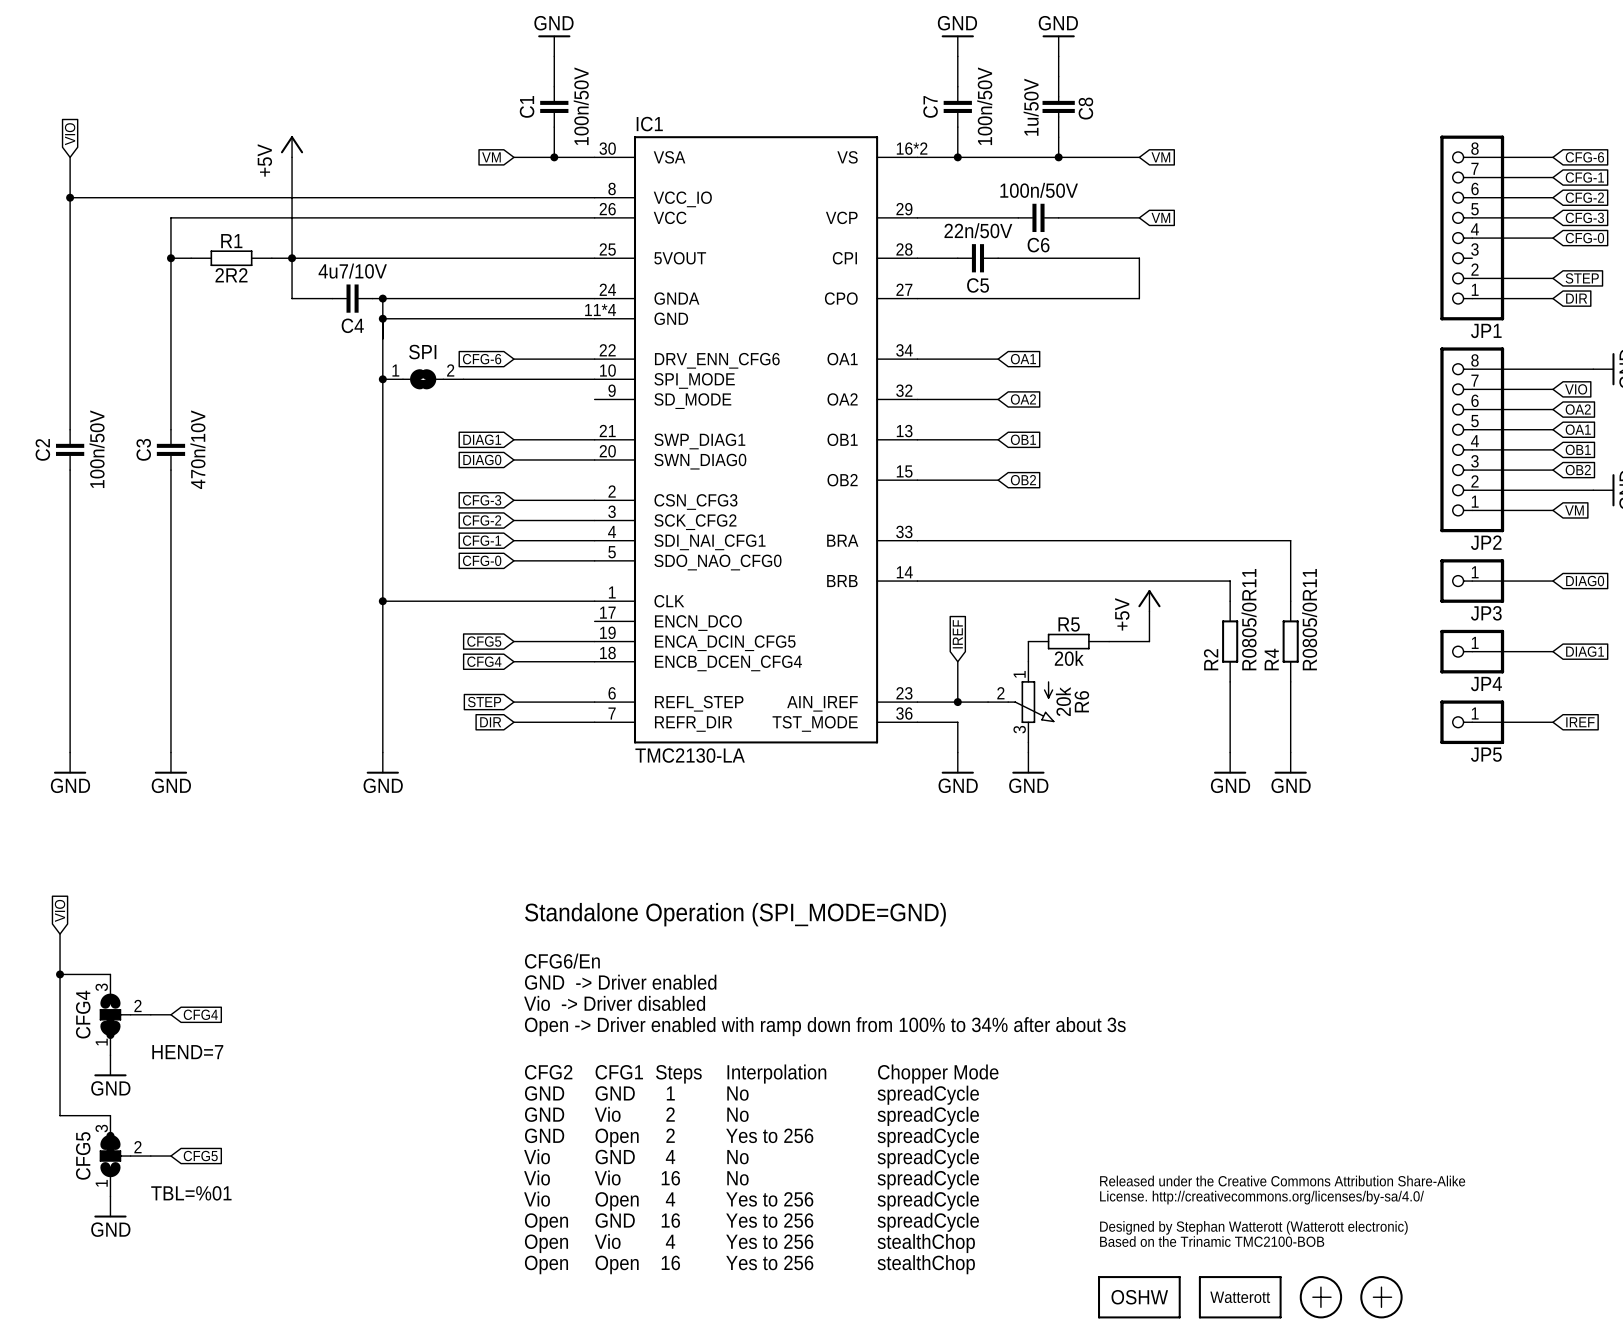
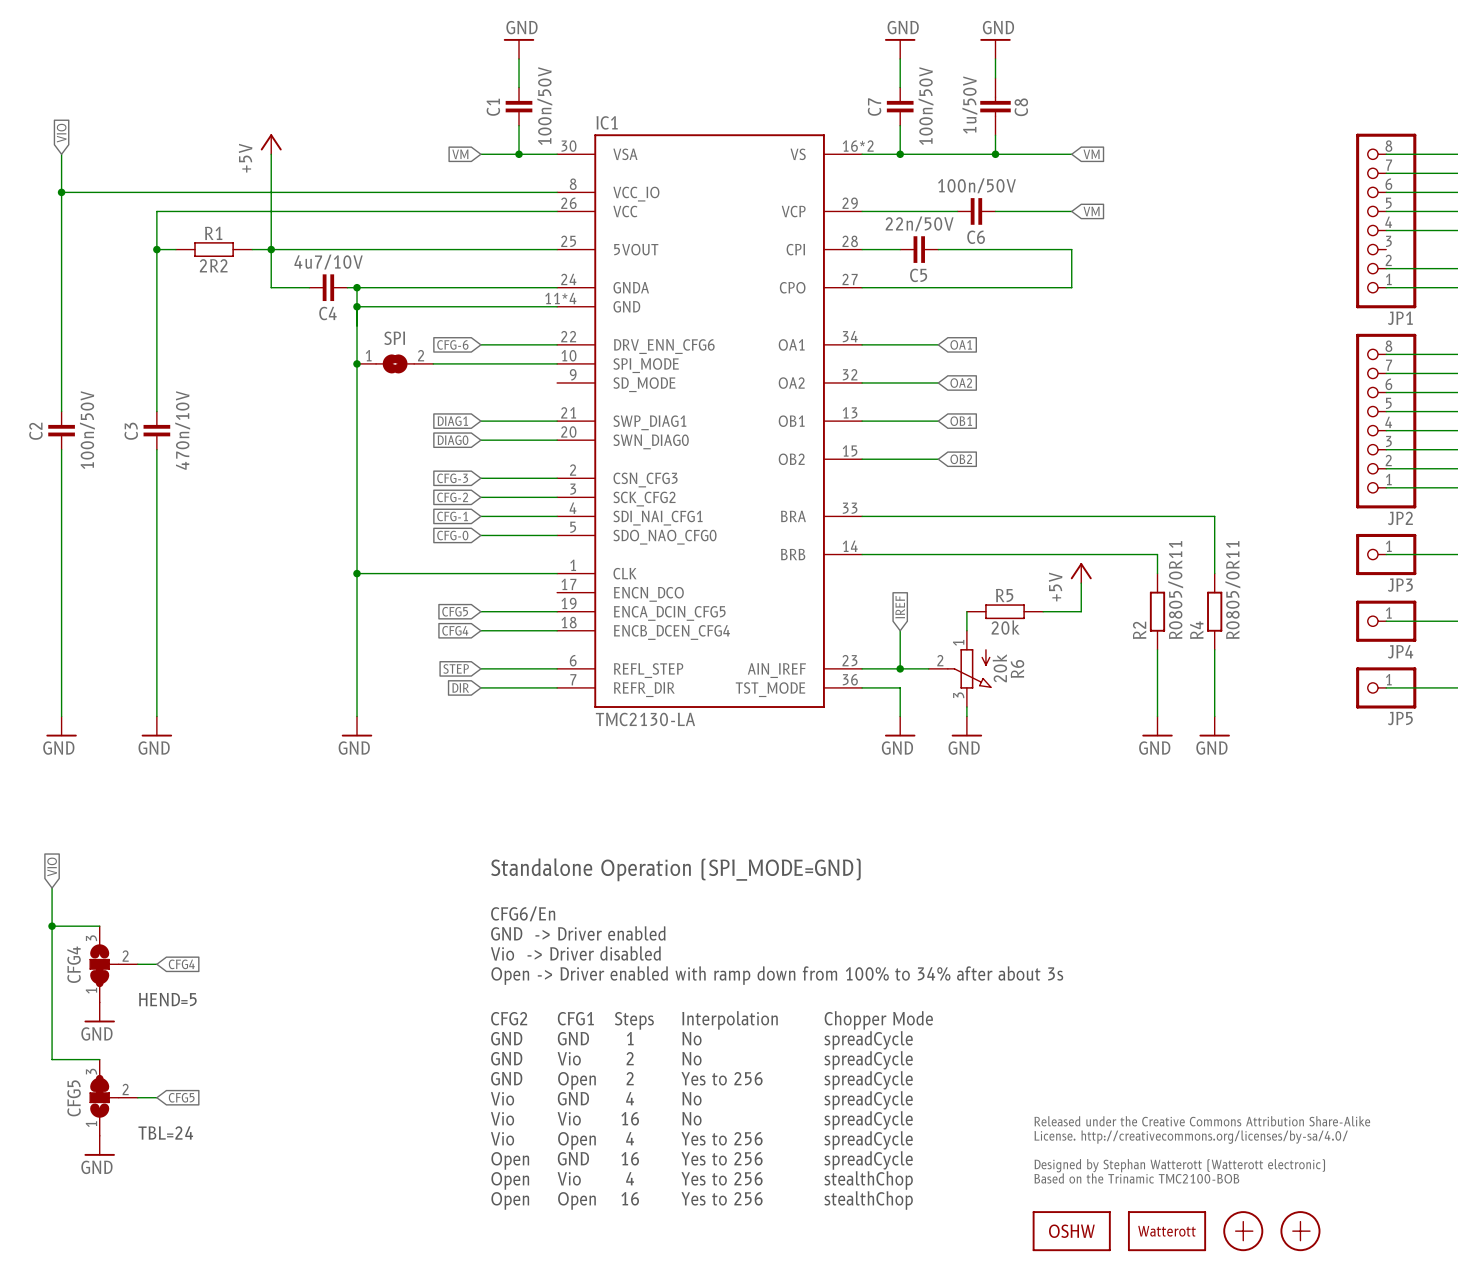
text: HEND=7 (187, 1052) -> HEND=5 (167, 999)
text: TBL=%01 (191, 1193) -> TBL=24 (165, 1132)

